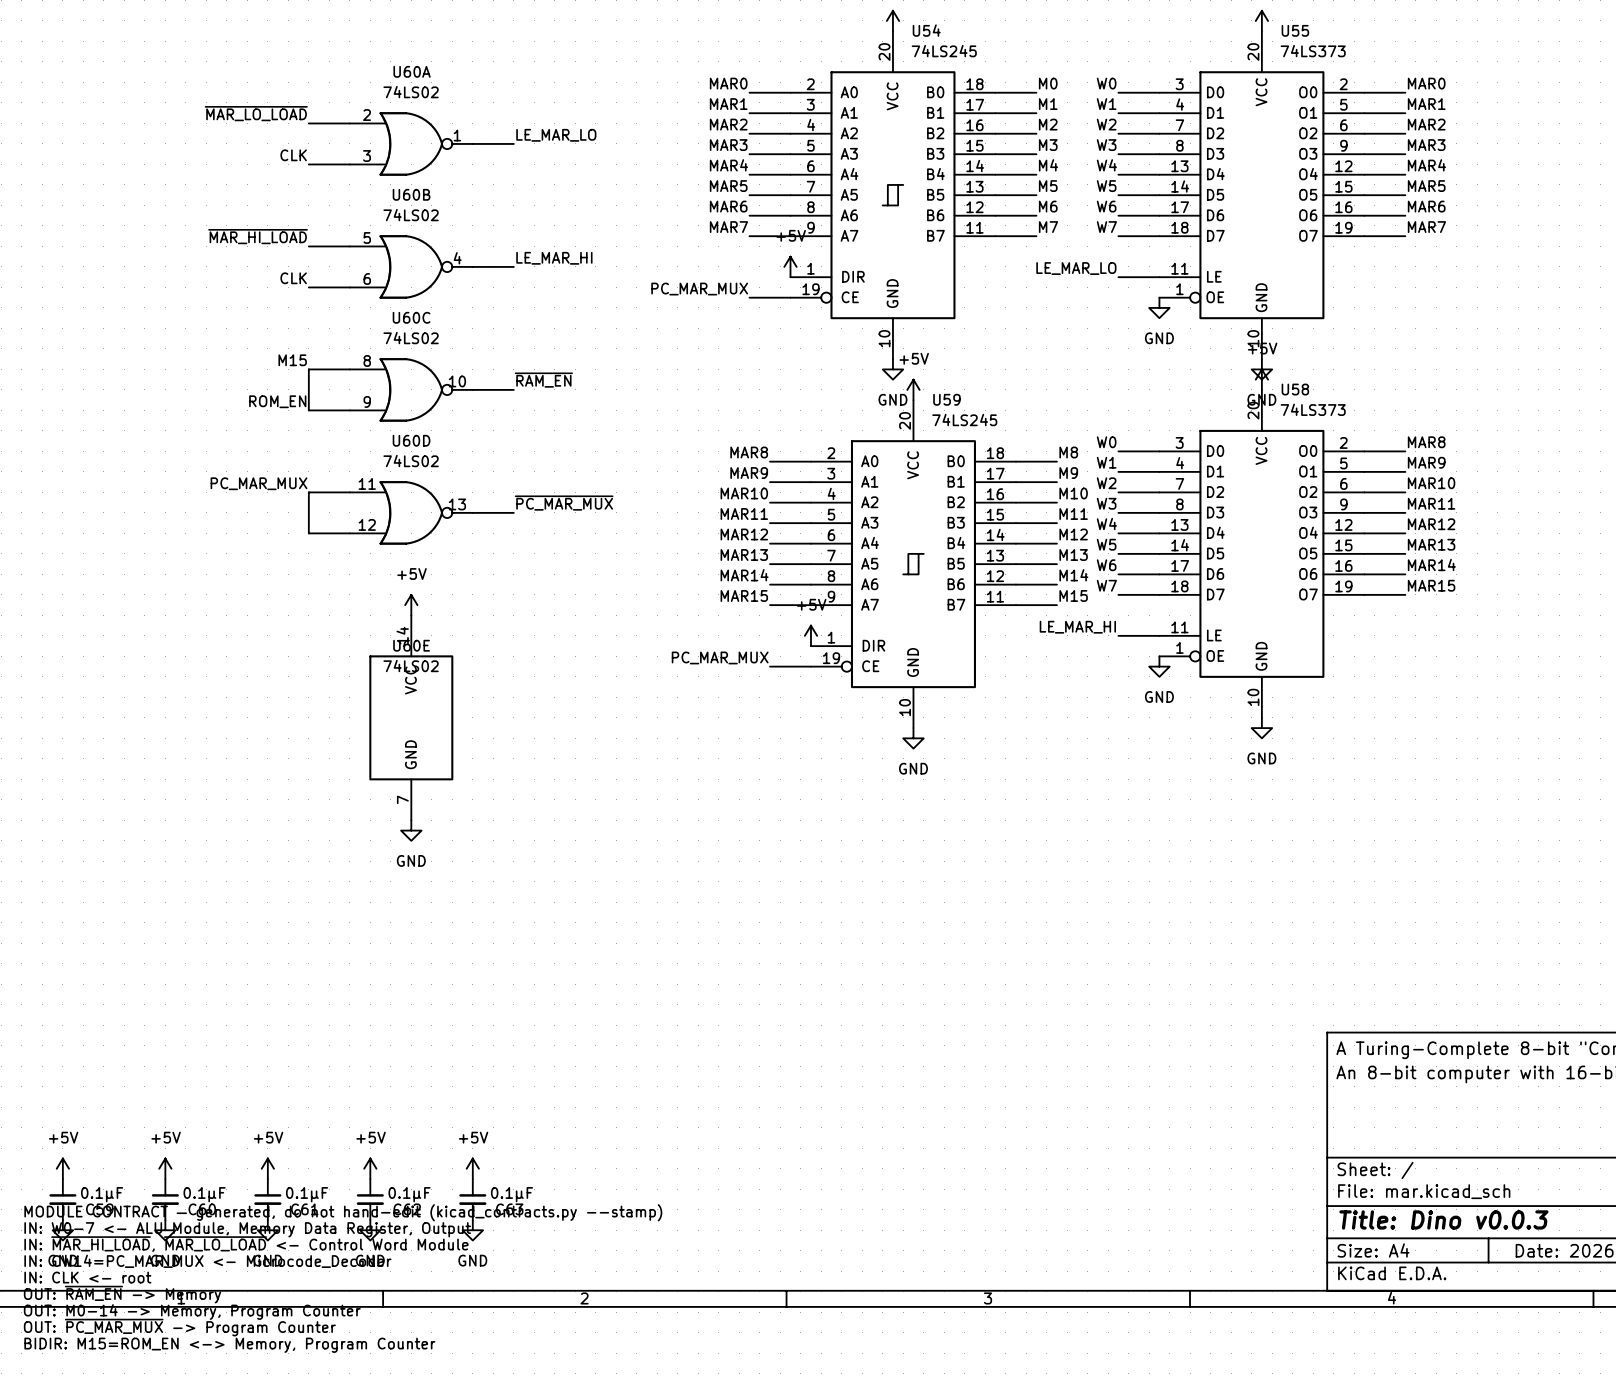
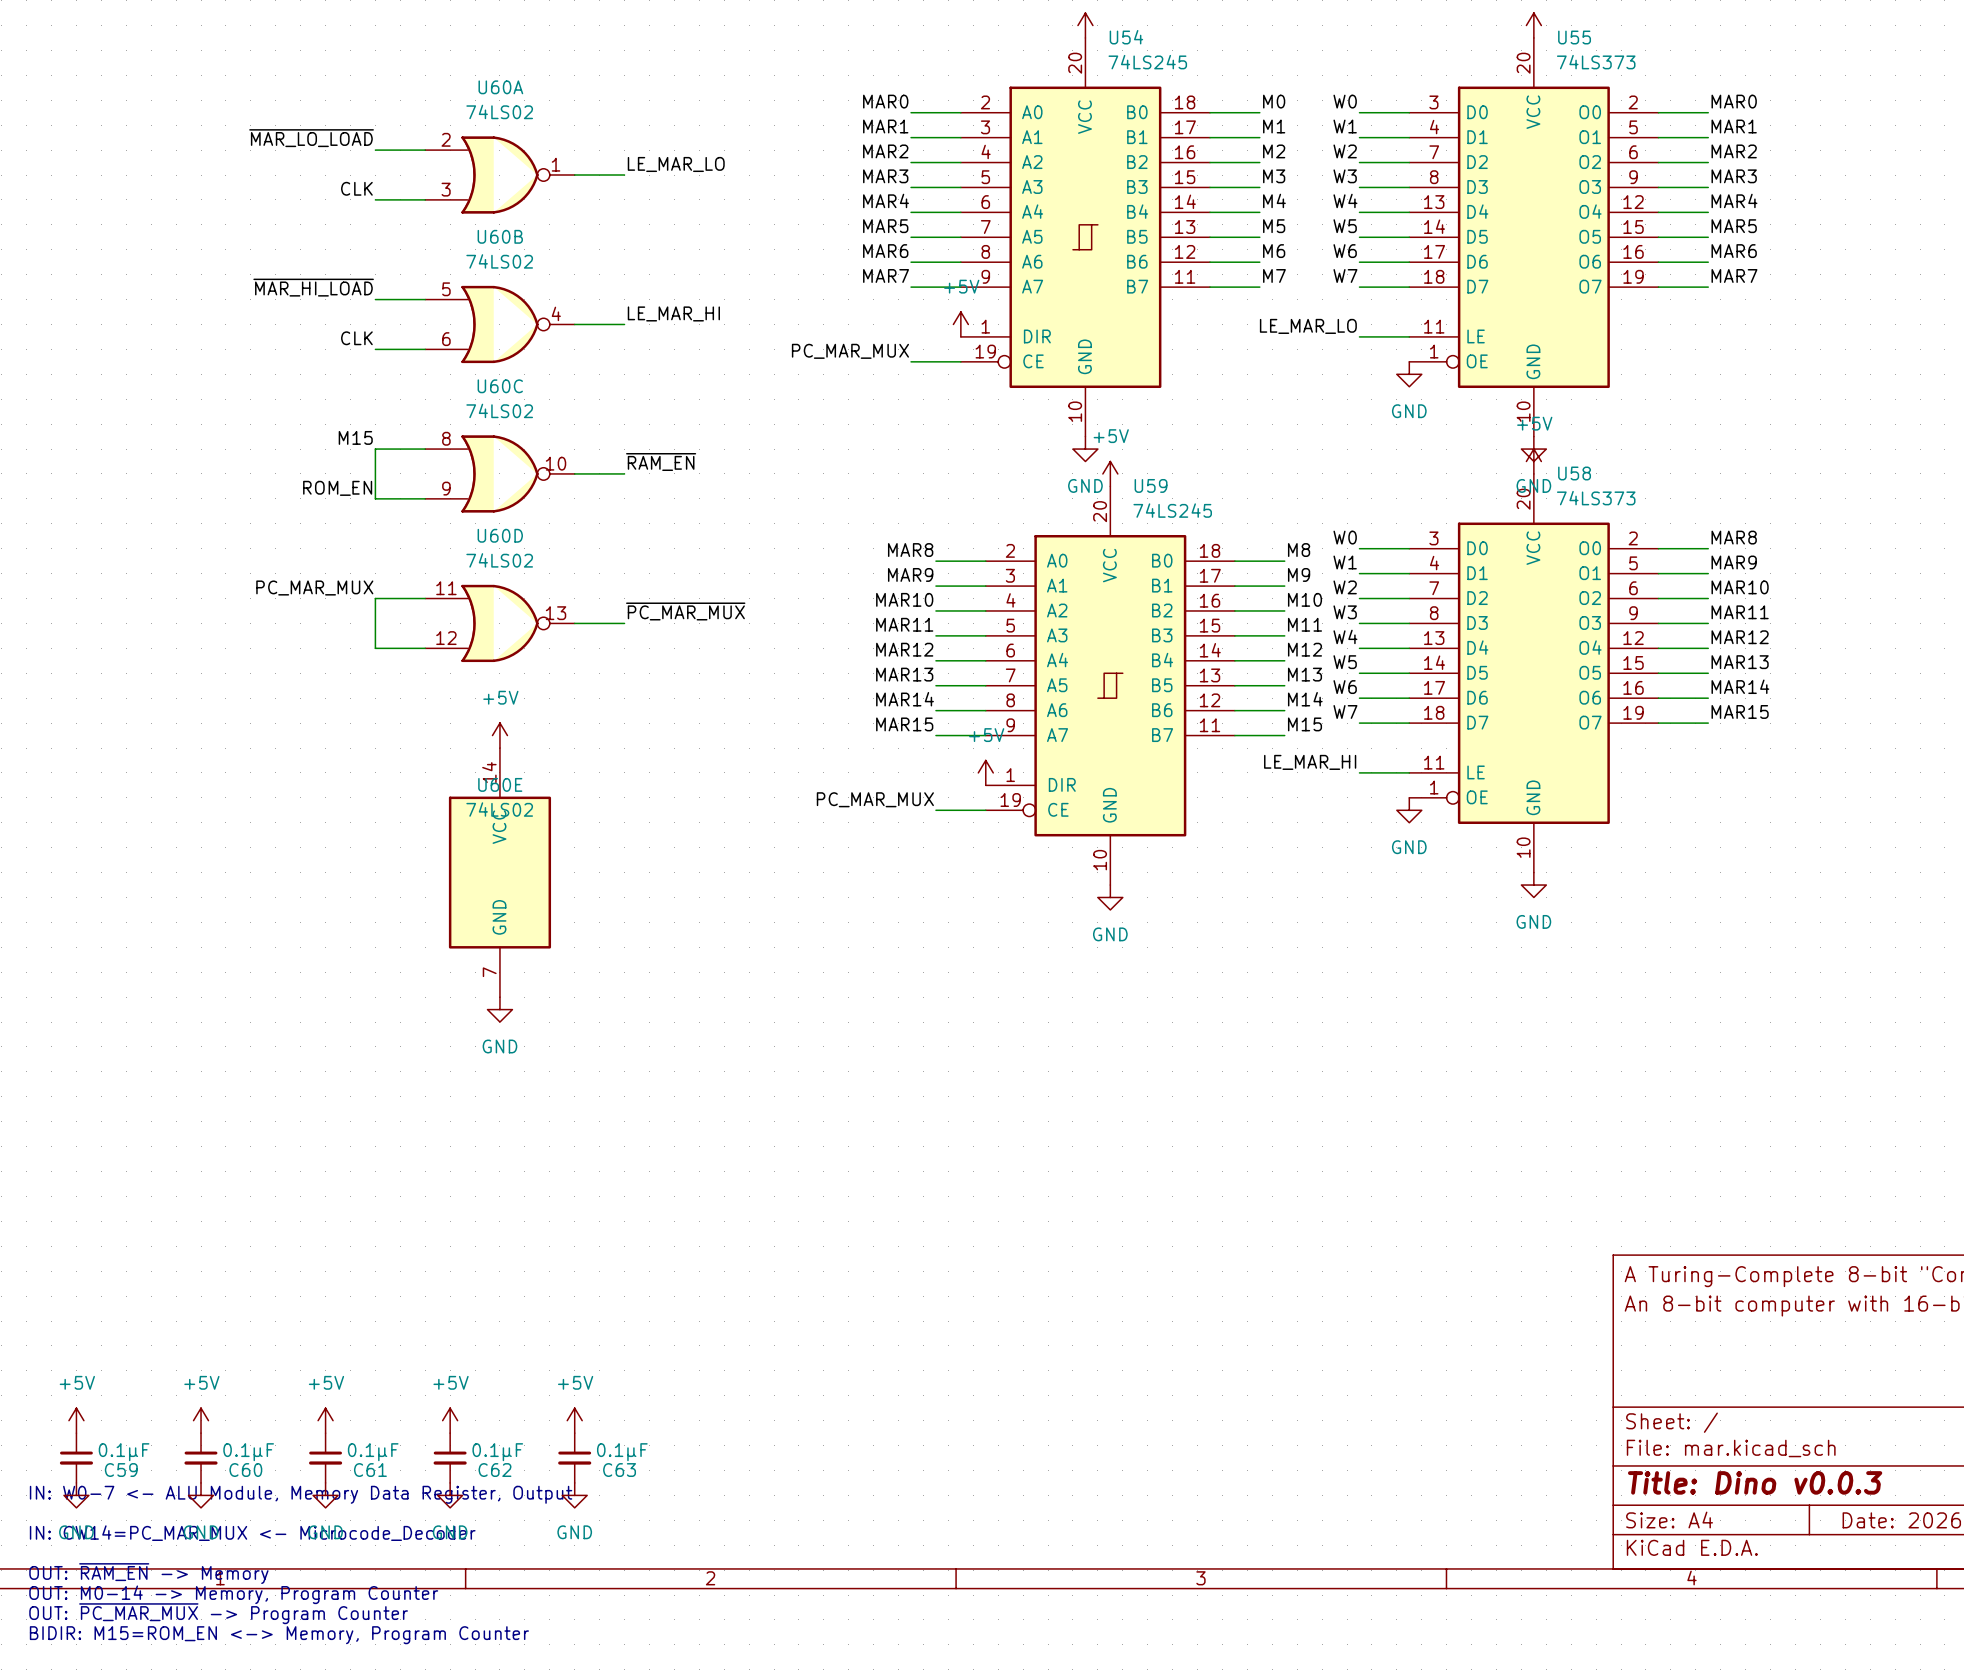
text: MODULE CONTRACT — generated, do not hand-edit (kicad_contracts.py --stamp) (343, 1212) -> none
text: IN: ~{MAR_HI_LOAD}, ~{MAR_LO_LOAD} <- Control Word Module (246, 1244) -> none
text: IN: CLK <- root (87, 1277) -> none

